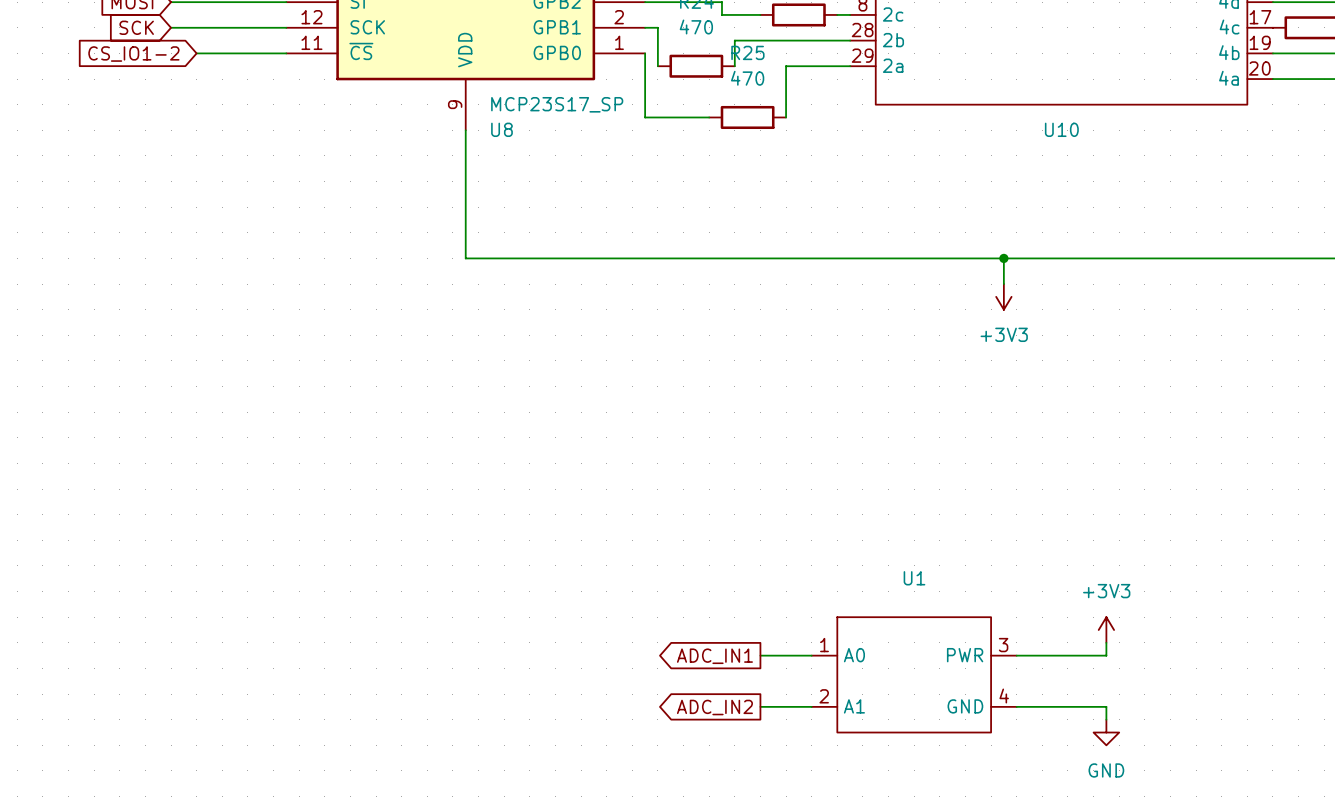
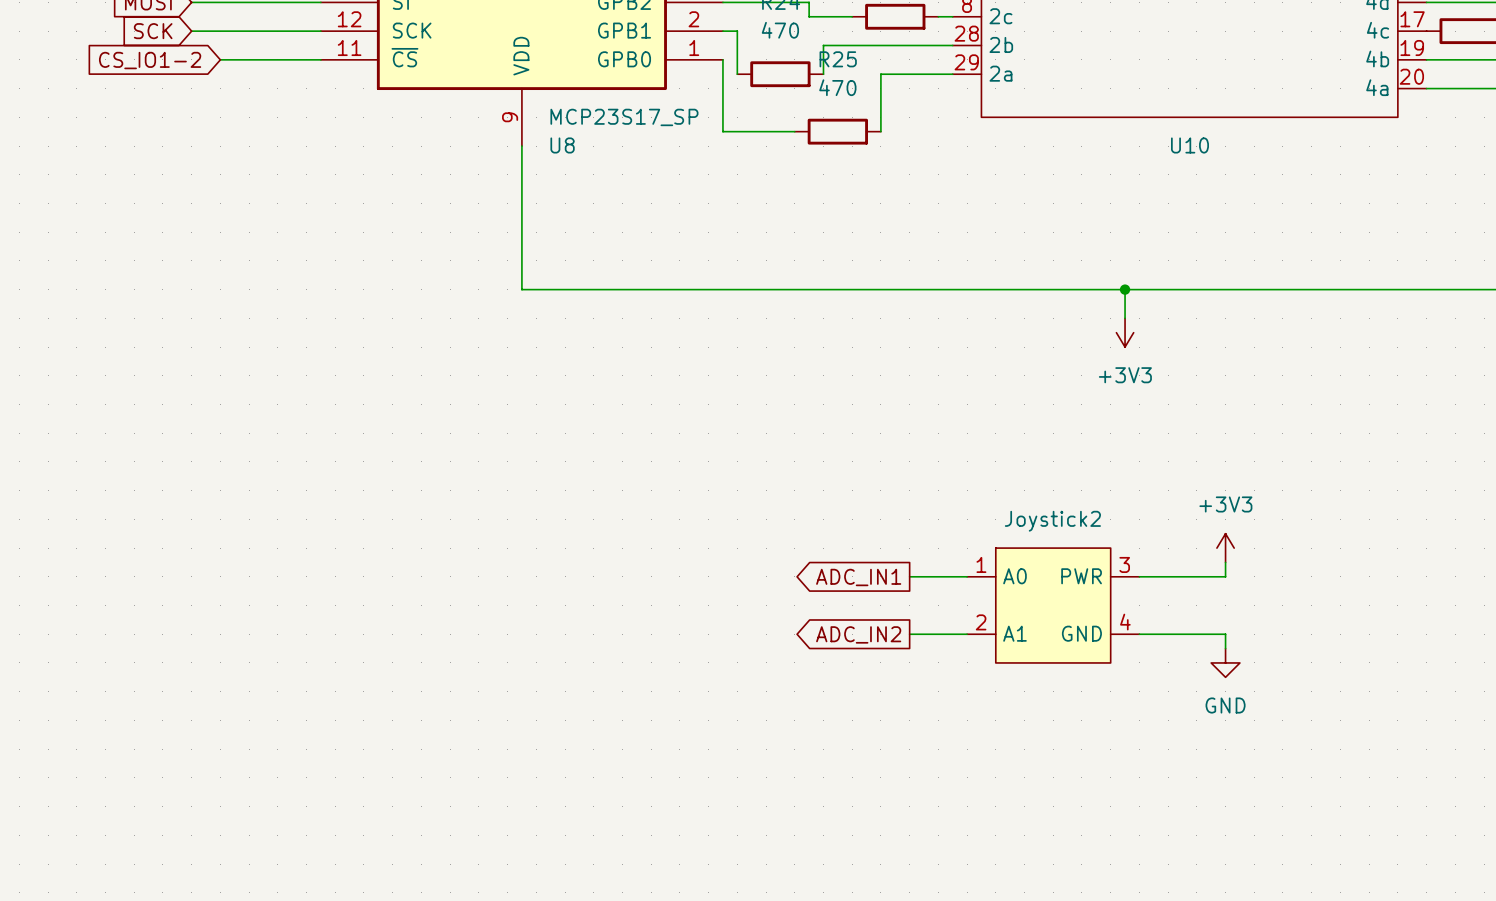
wire: none -> (1225, 562) (1225, 576) (1139, 576)
Joystick2: none -> (1053, 605)
wire: none -> (1139, 634) (1225, 634) (1225, 648)
power symbol position: +3V3 (1106, 630) -> +3V3 (1225, 548)
wire: (1106, 642) (1106, 655) (1016, 655) -> none
wire: (760, 655) (811, 655) -> (909, 634) (967, 634)
global label position: ADC_IN1 (714, 656) -> ADC_IN1 (858, 577)
U1: (914, 674) -> none
wire: (760, 706) (811, 706) -> (909, 576) (967, 576)
wire: (1016, 706) (1106, 706) (1106, 719) -> none
global label position: ADC_IN2 (714, 707) -> ADC_IN2 (858, 634)
power symbol position: GND (1106, 732) -> GND (1225, 662)

